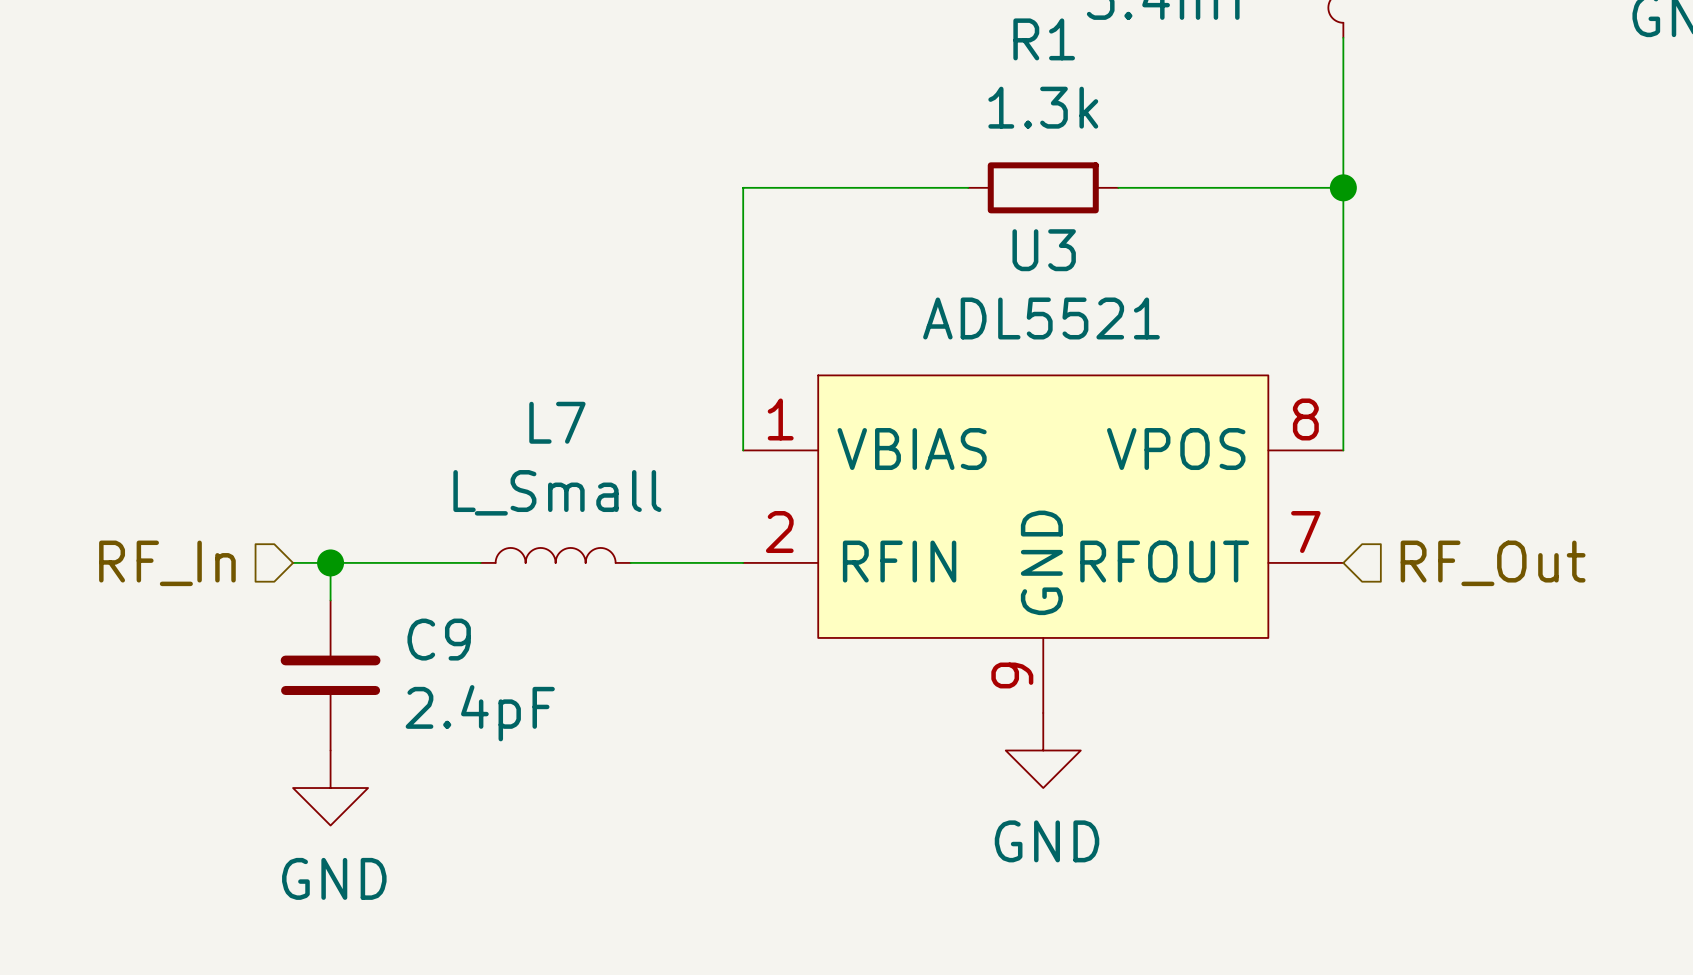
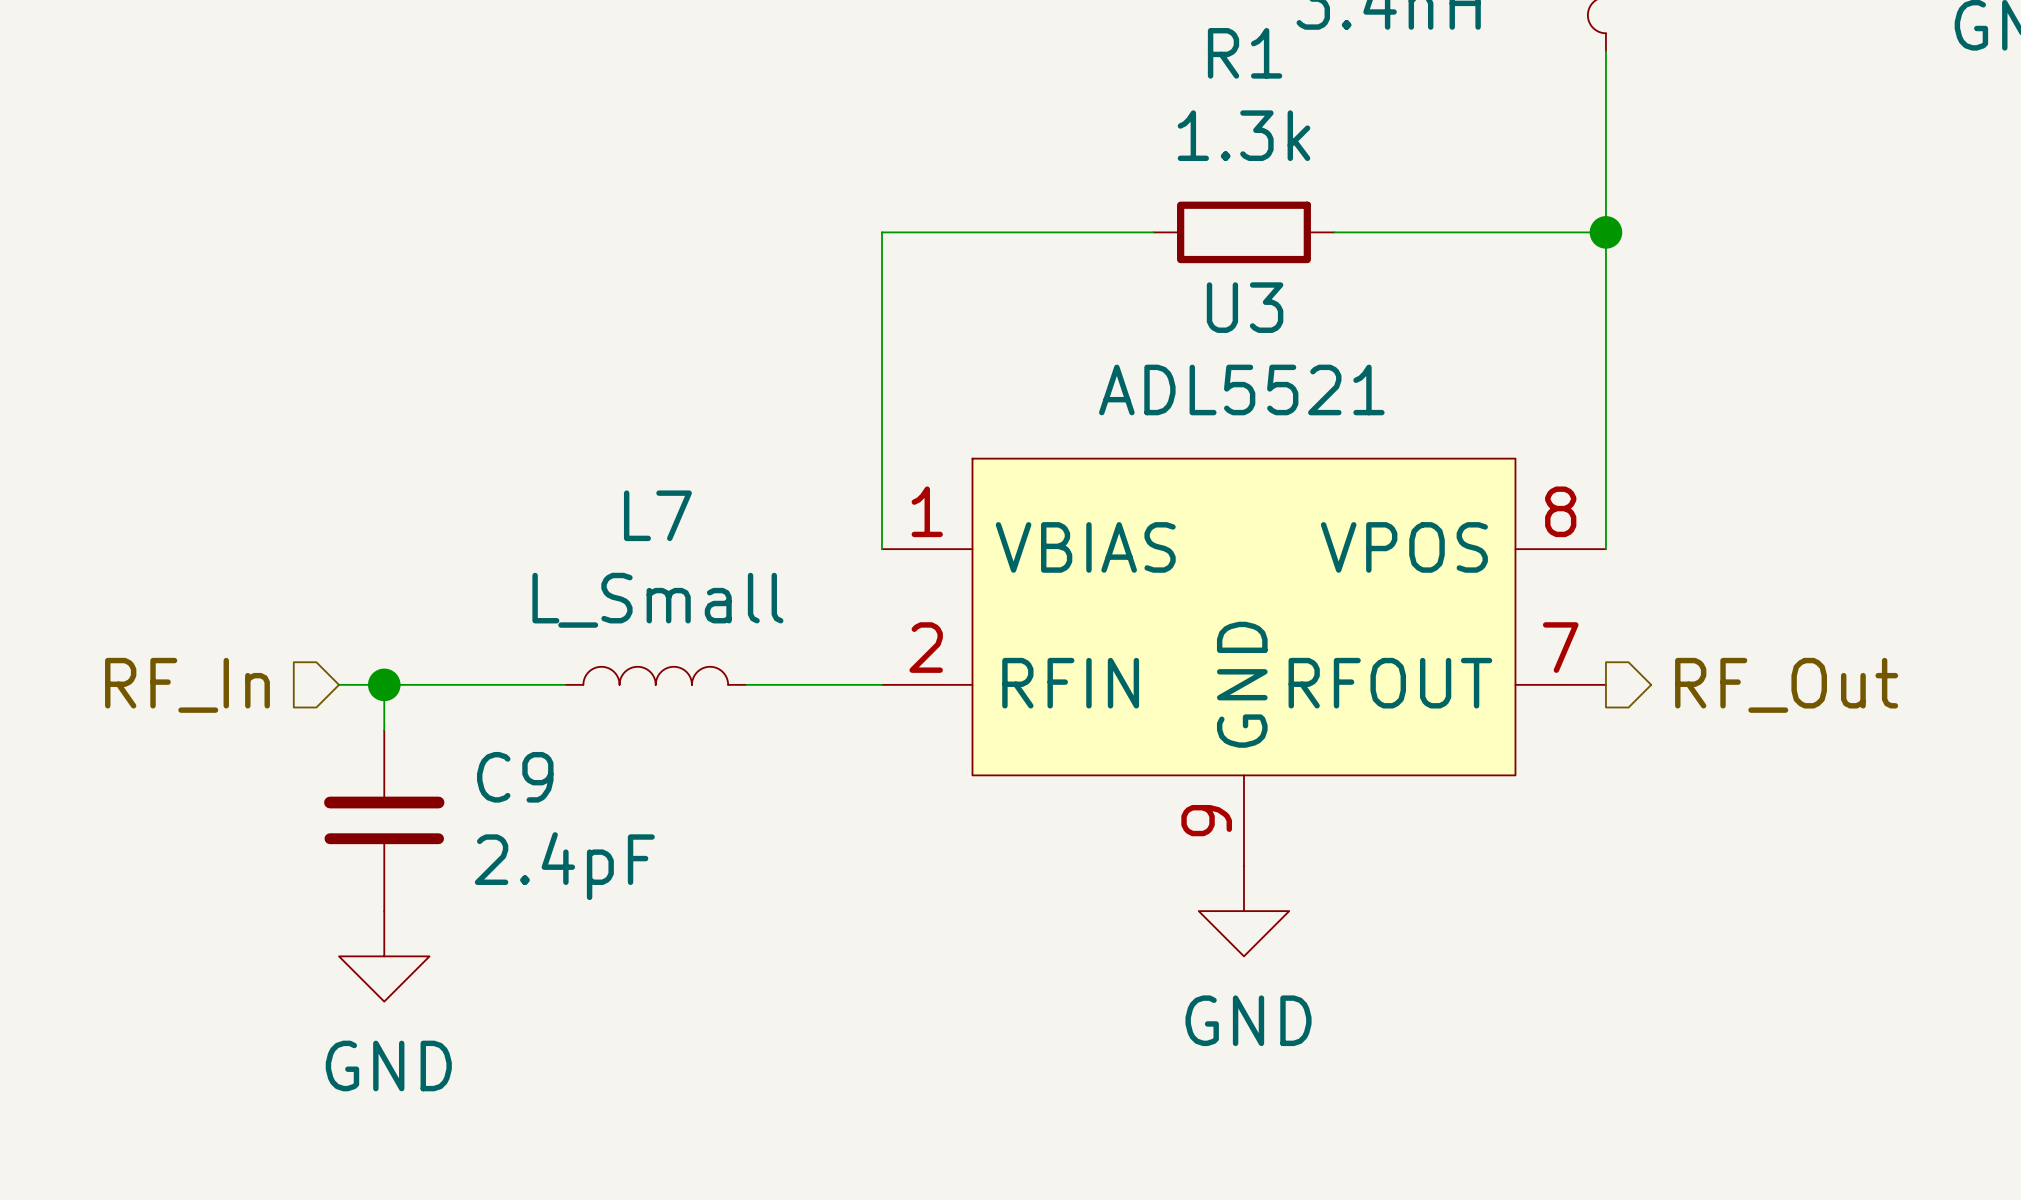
hierarchical label shape: input (1493, 563) -> output (1786, 685)

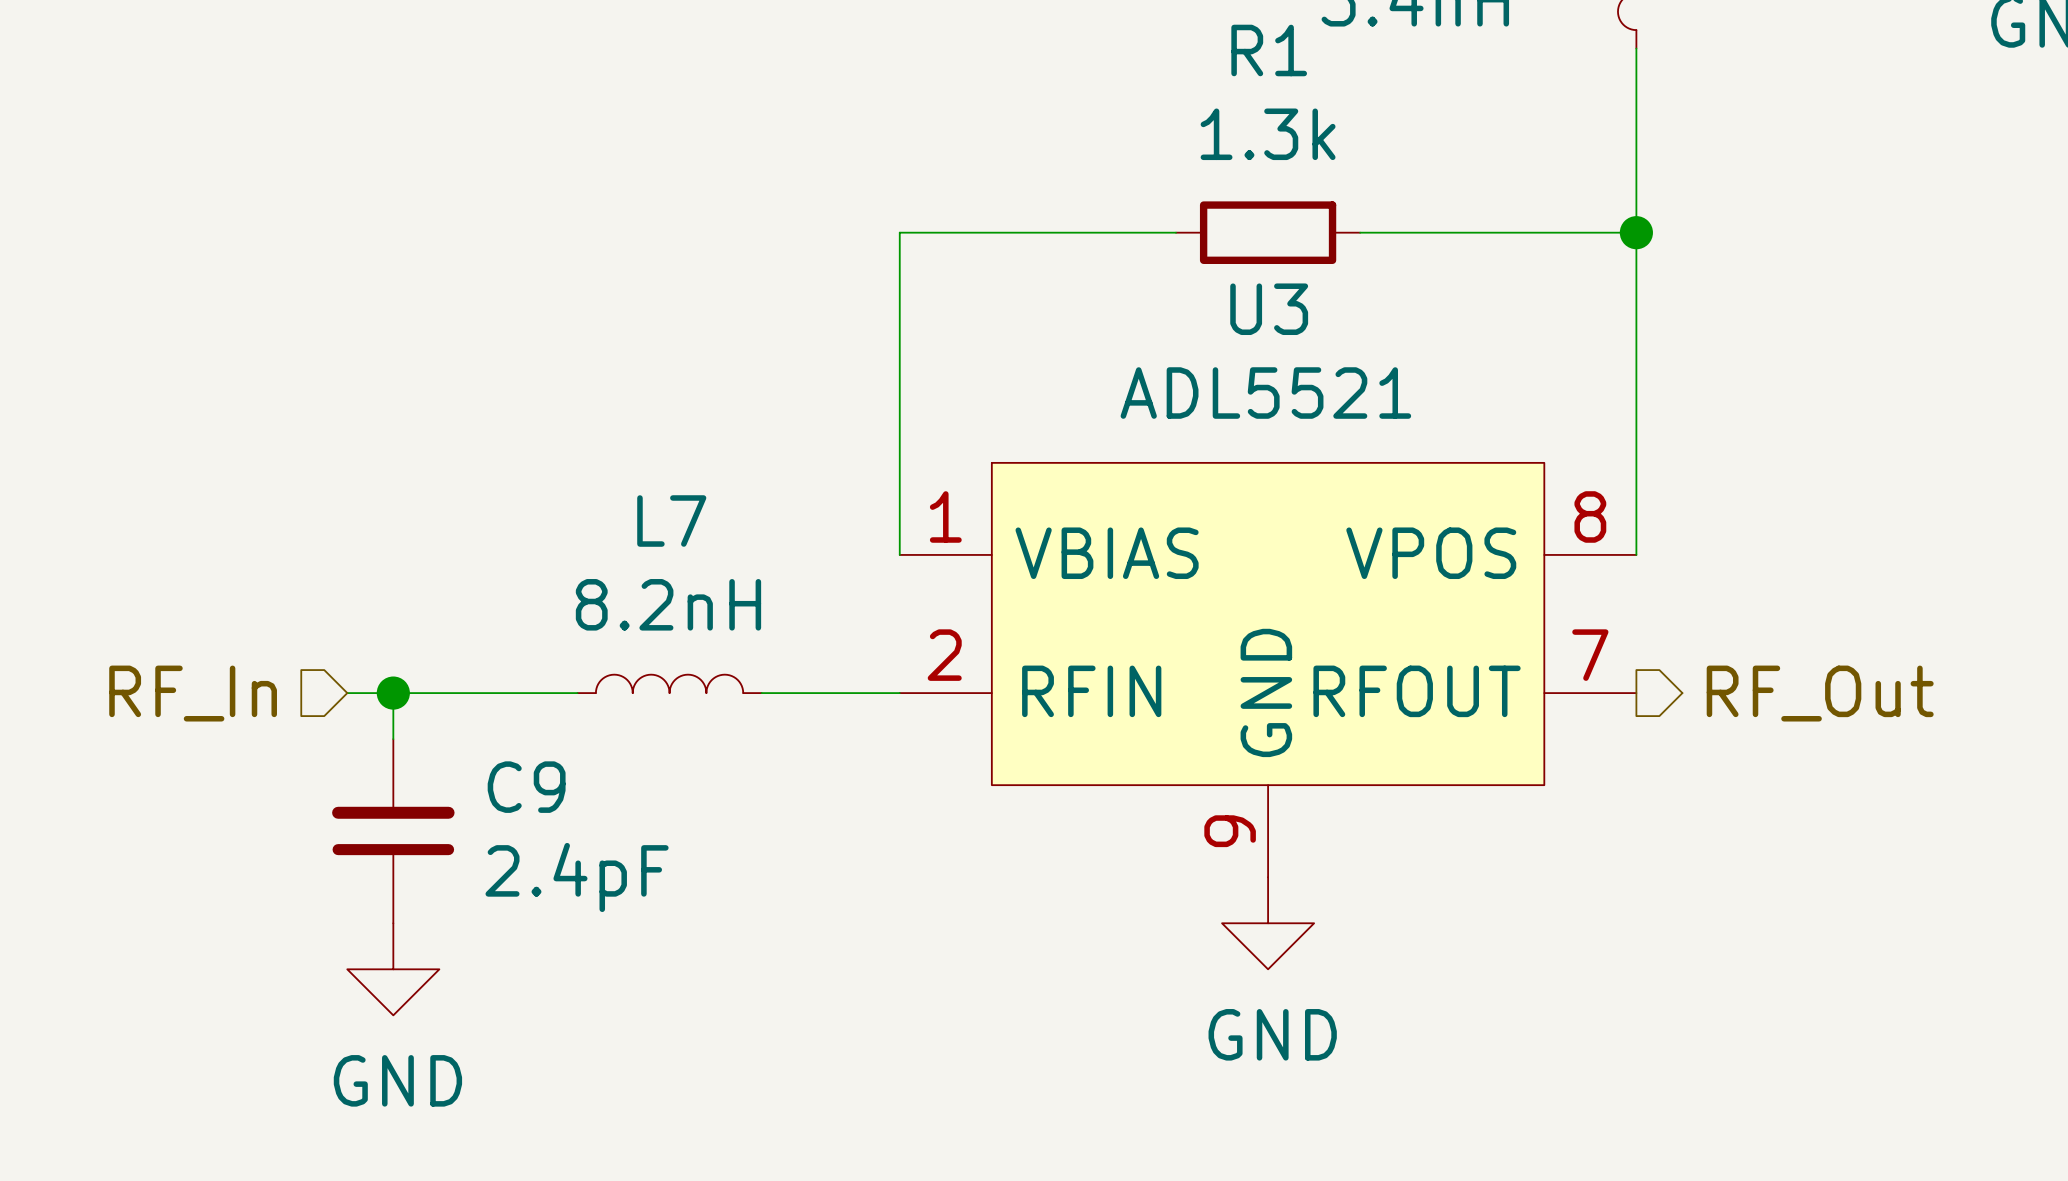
L7 value: L_Small (657, 600) -> 8.2nH (668, 604)

